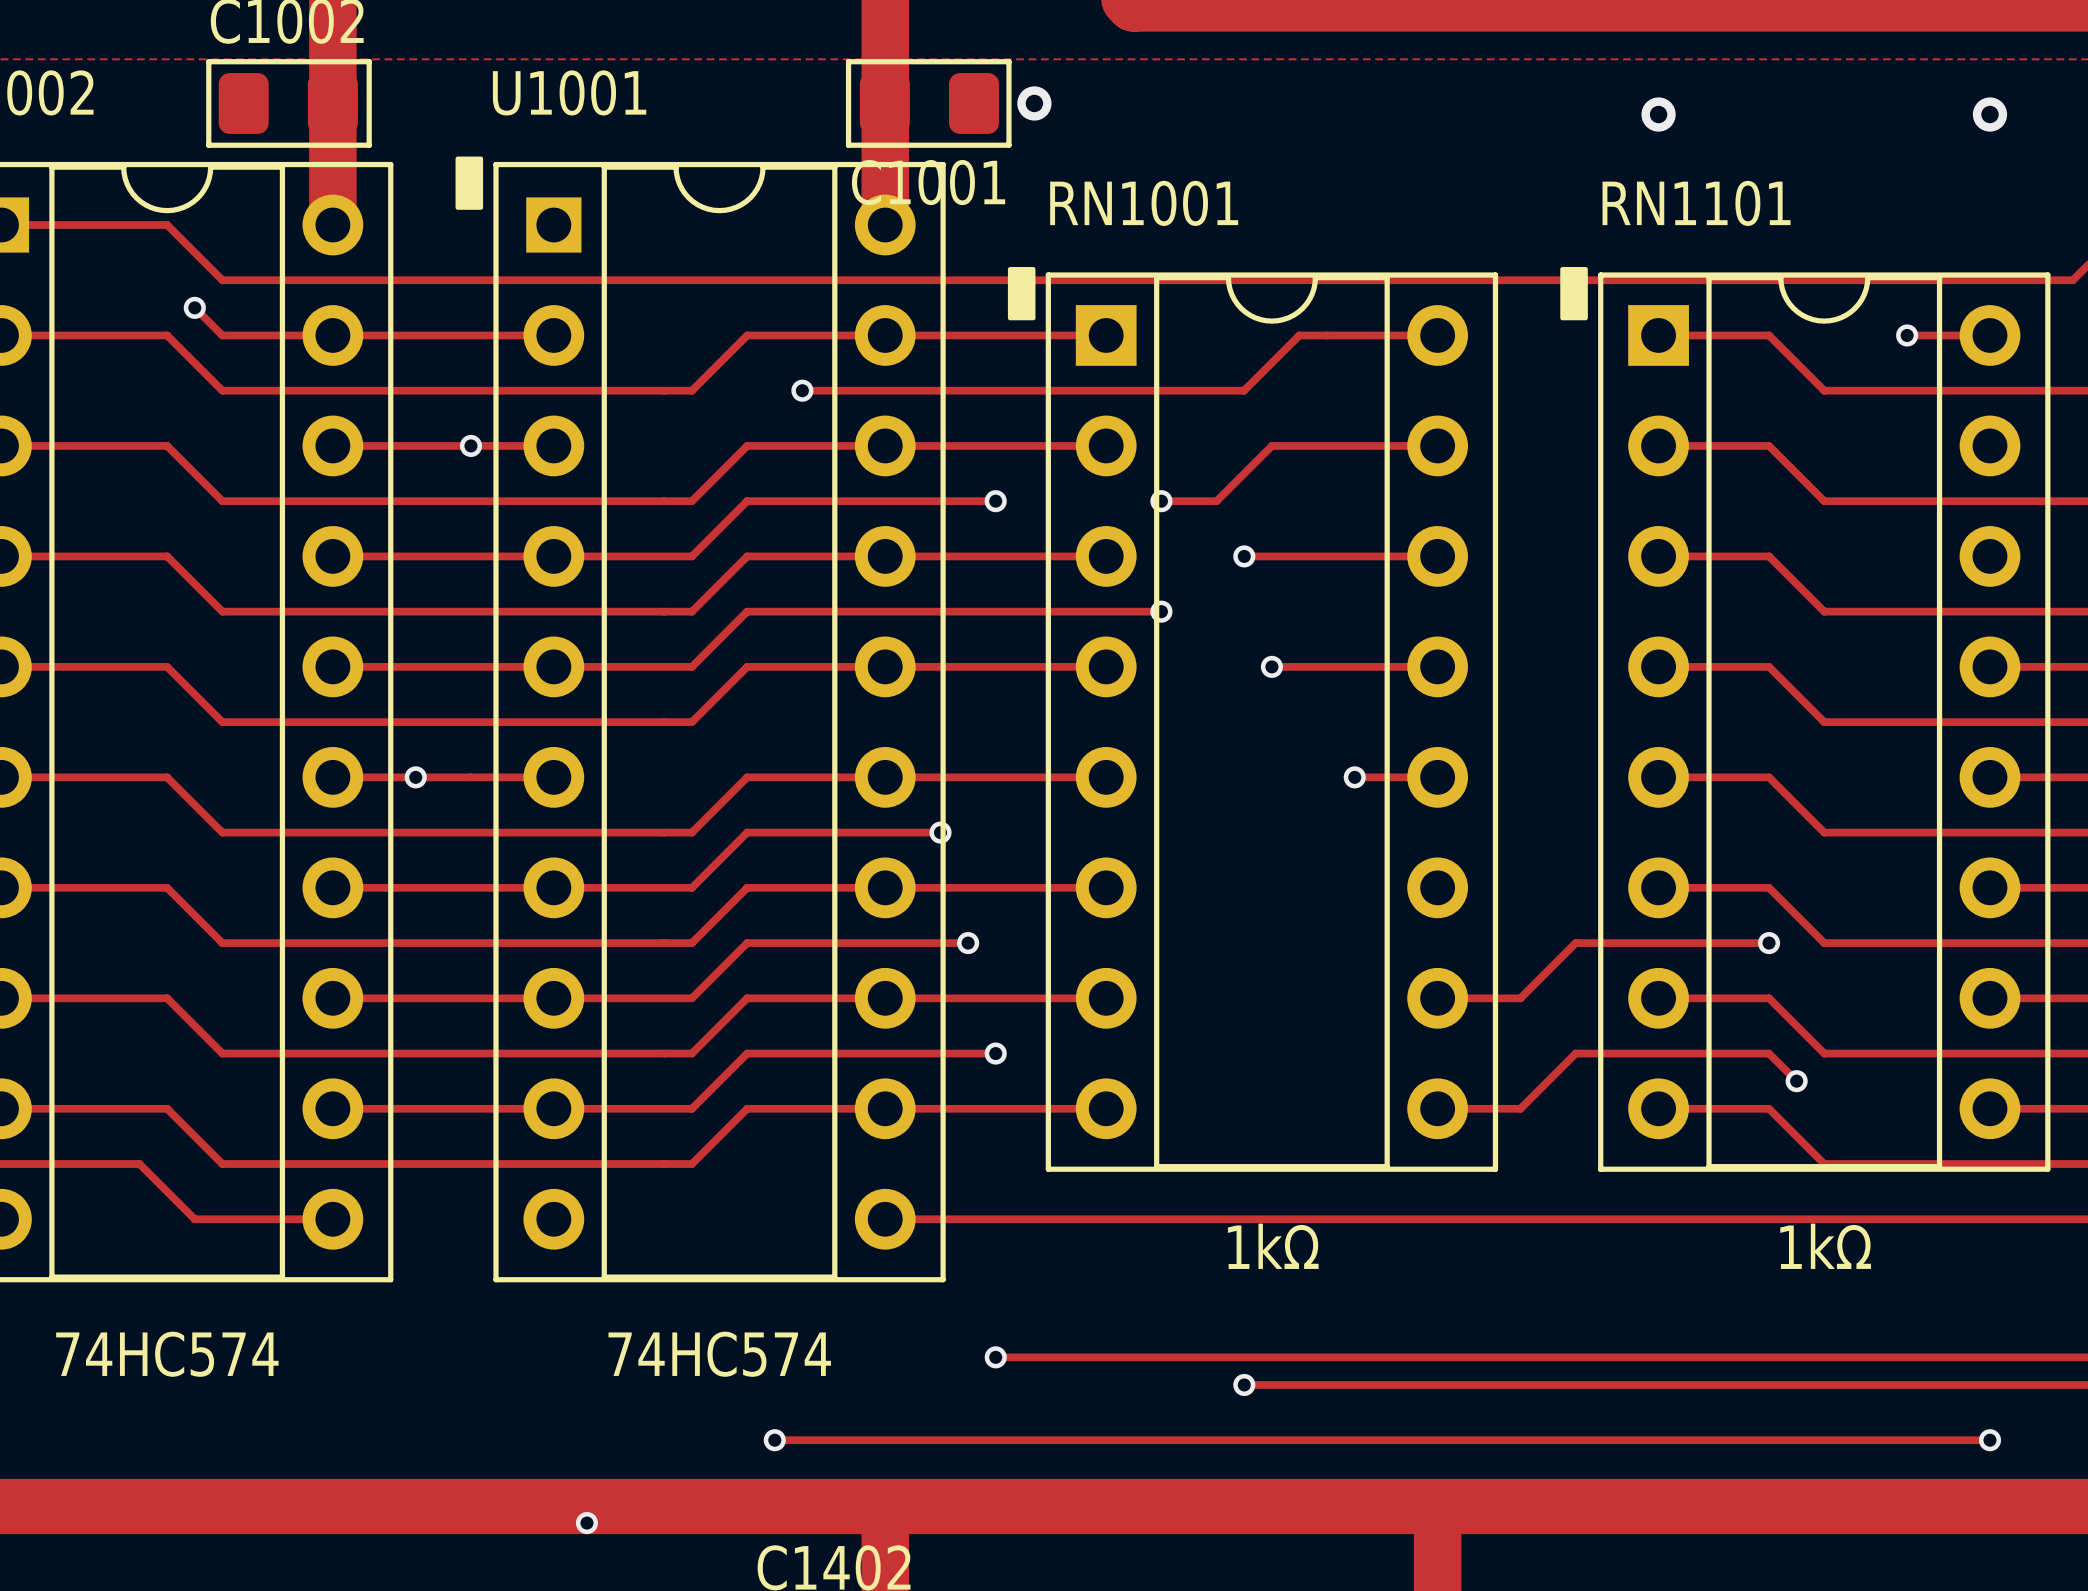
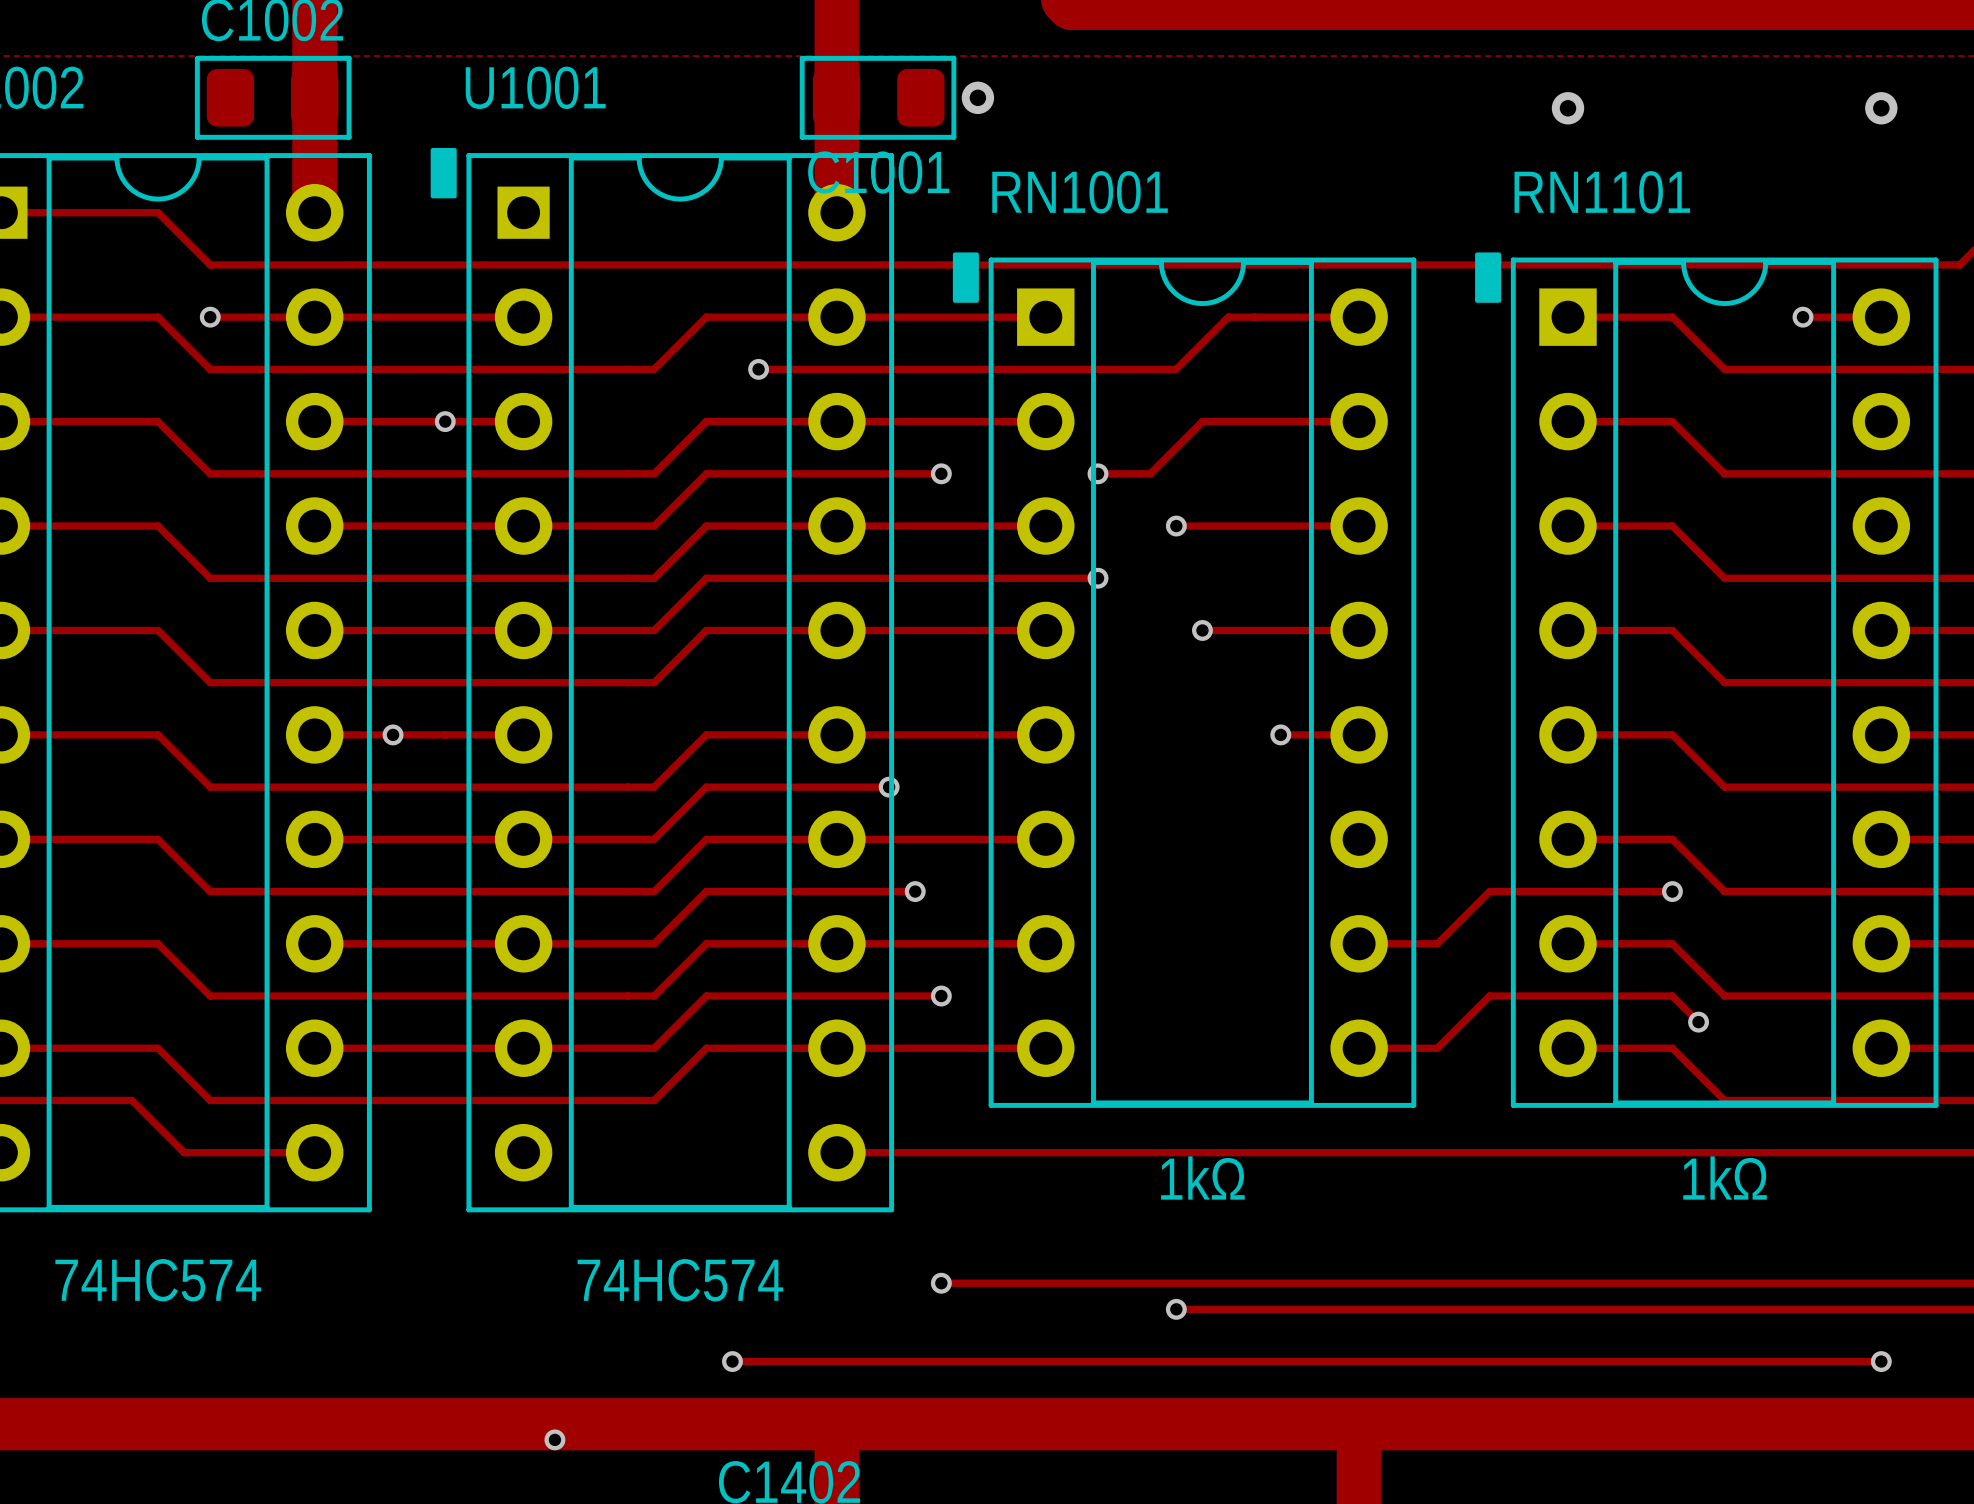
track: (194, 307) (222, 335) -> none
via position: (194, 307) -> (210, 317)

